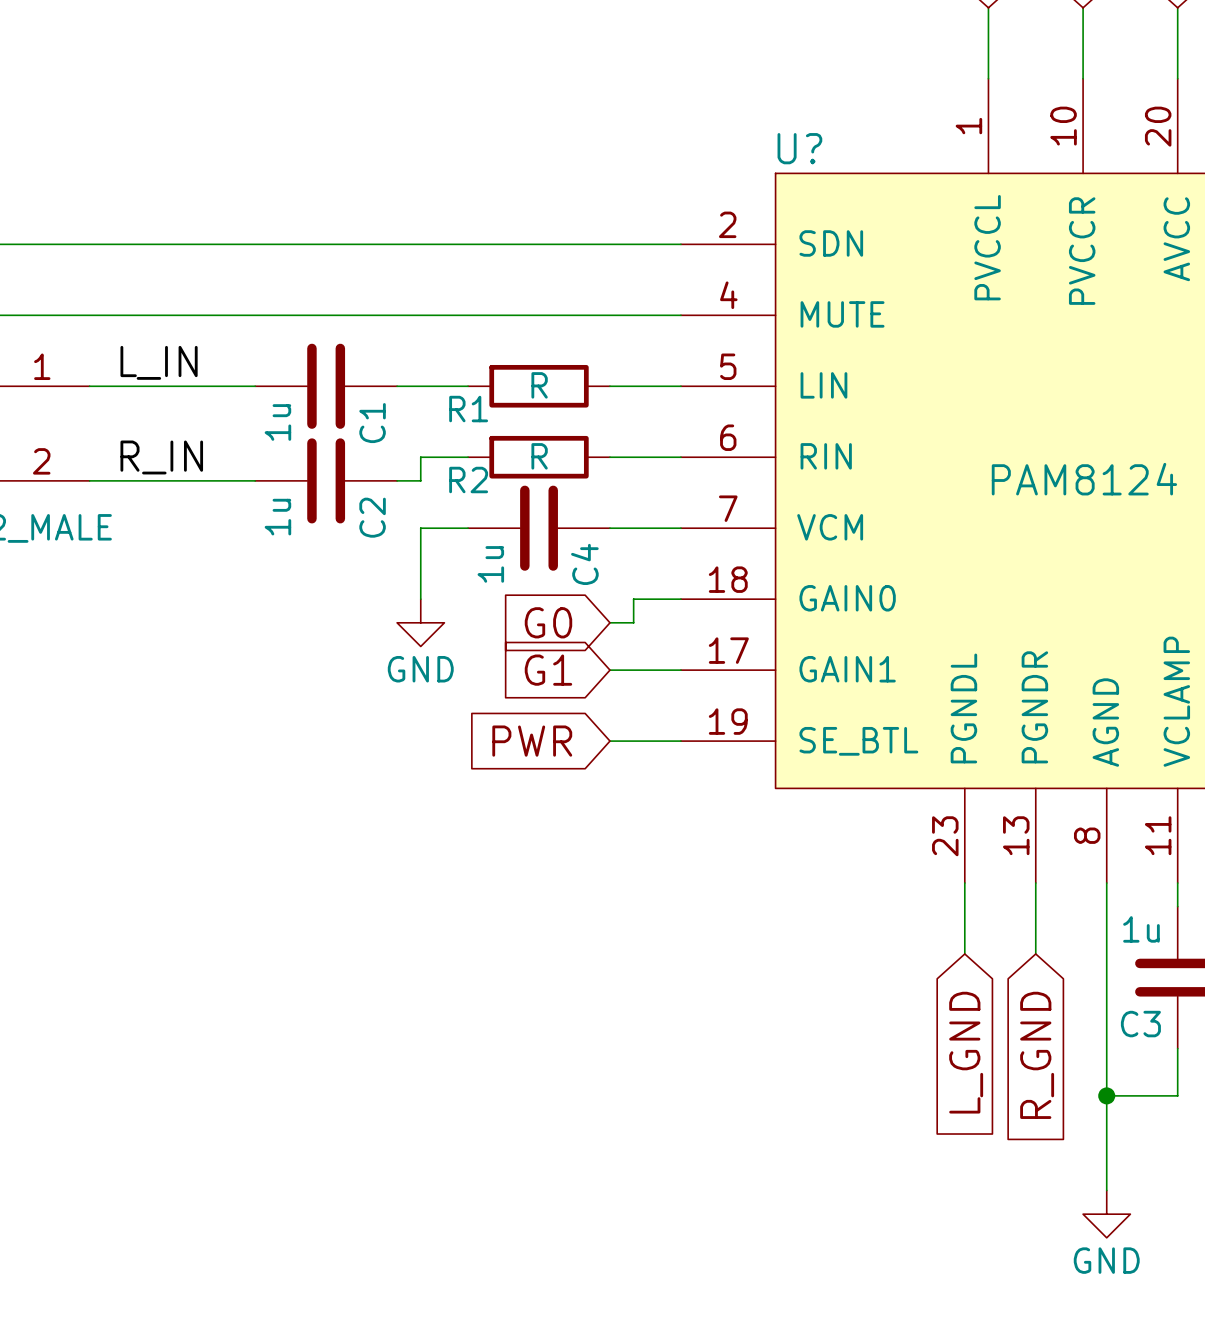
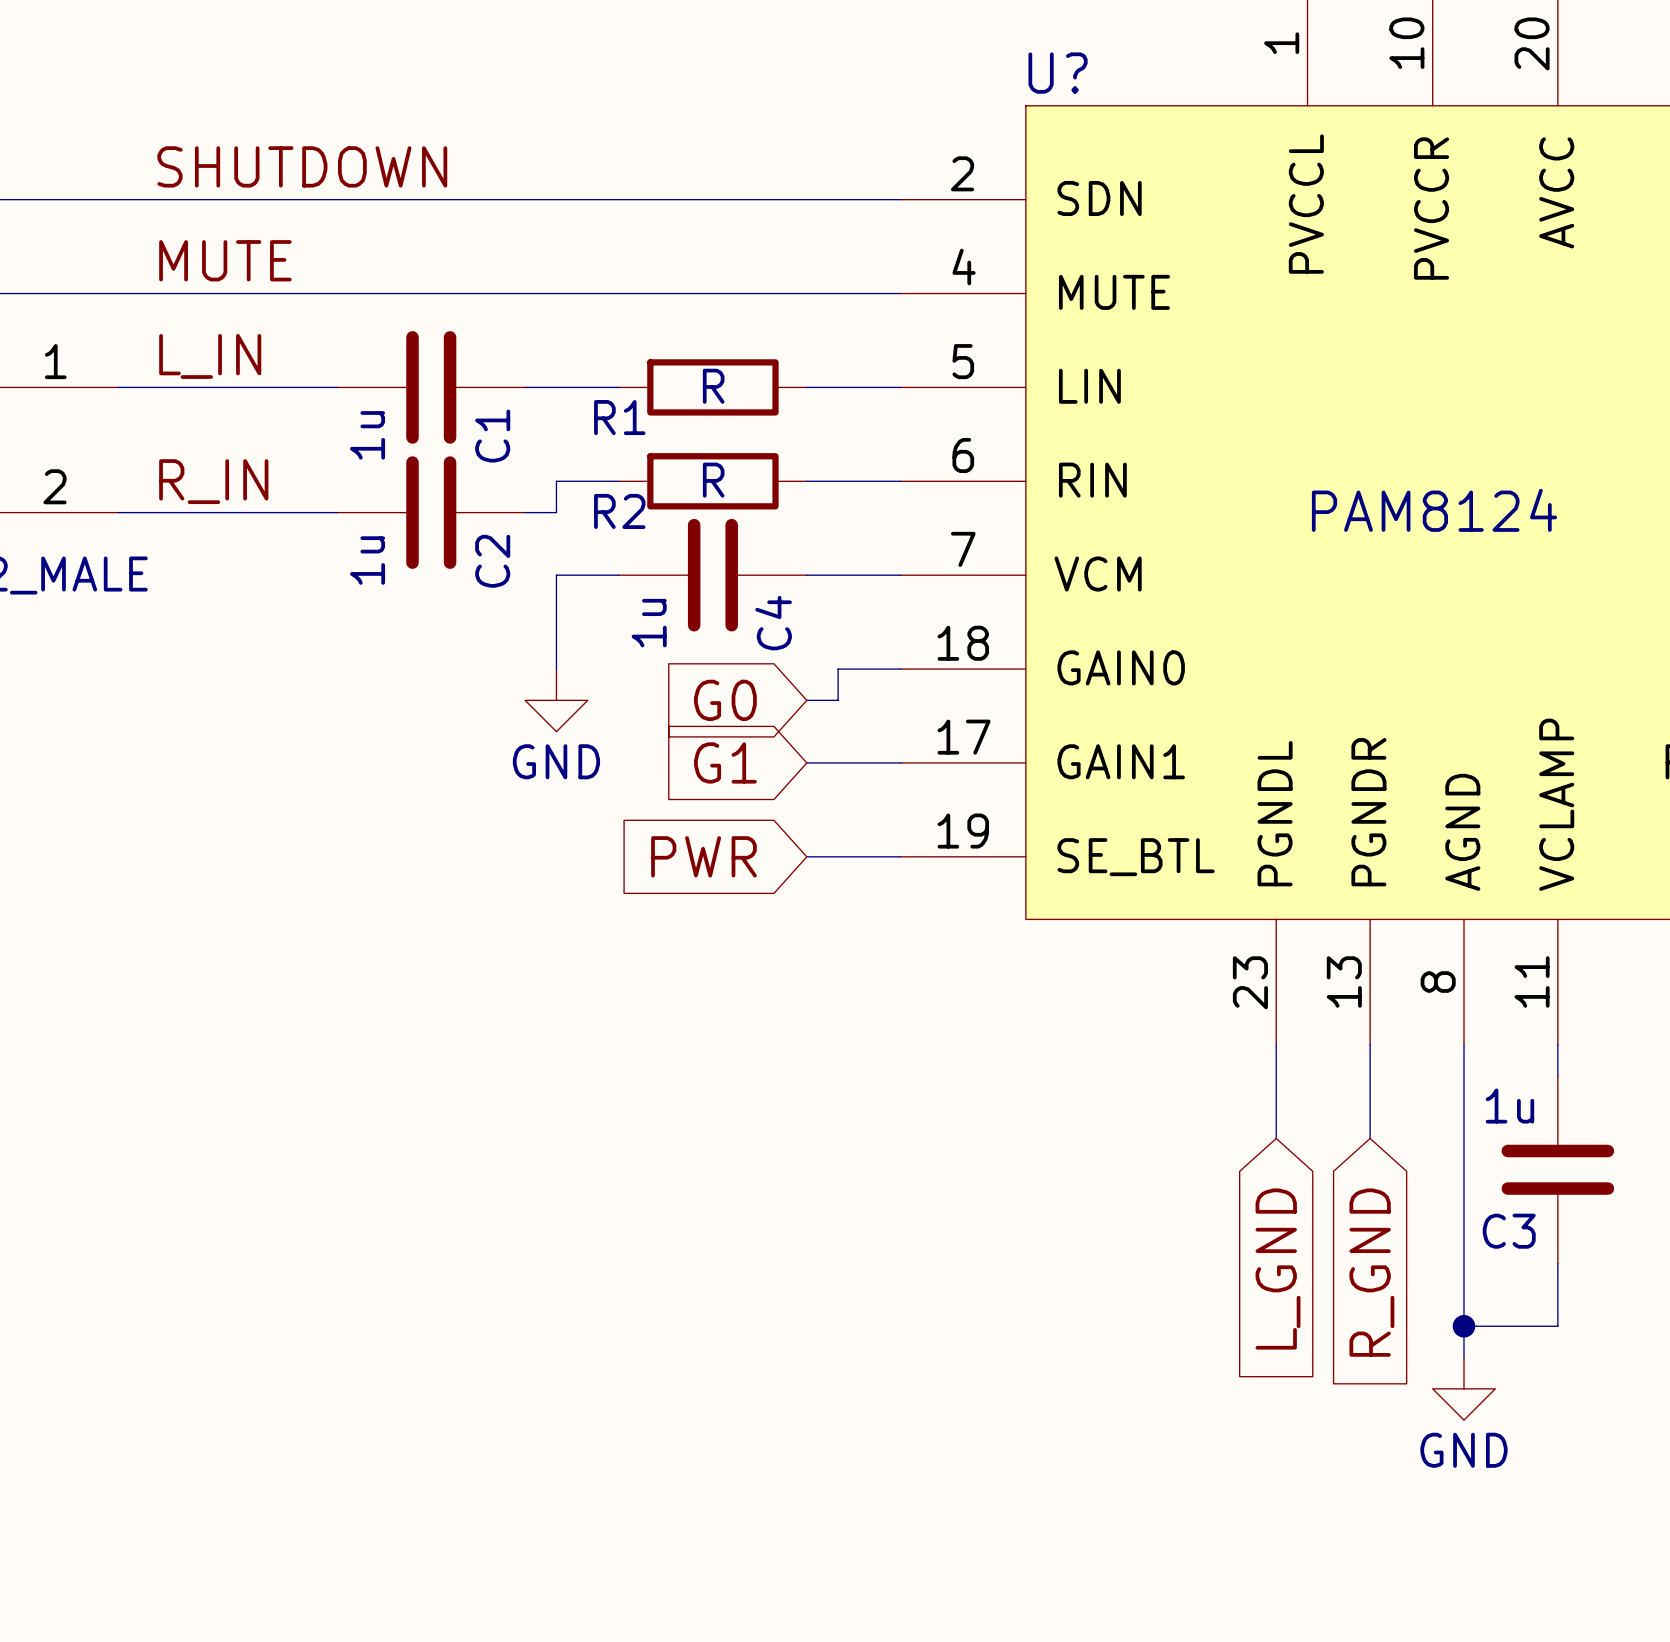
label: none -> SHUTDOWN (302, 166)
label: none -> MUTE (225, 260)
wire: (1106, 1119) (1106, 1190) -> none
power symbol position: GND (1106, 1214) -> GND (1463, 1388)

